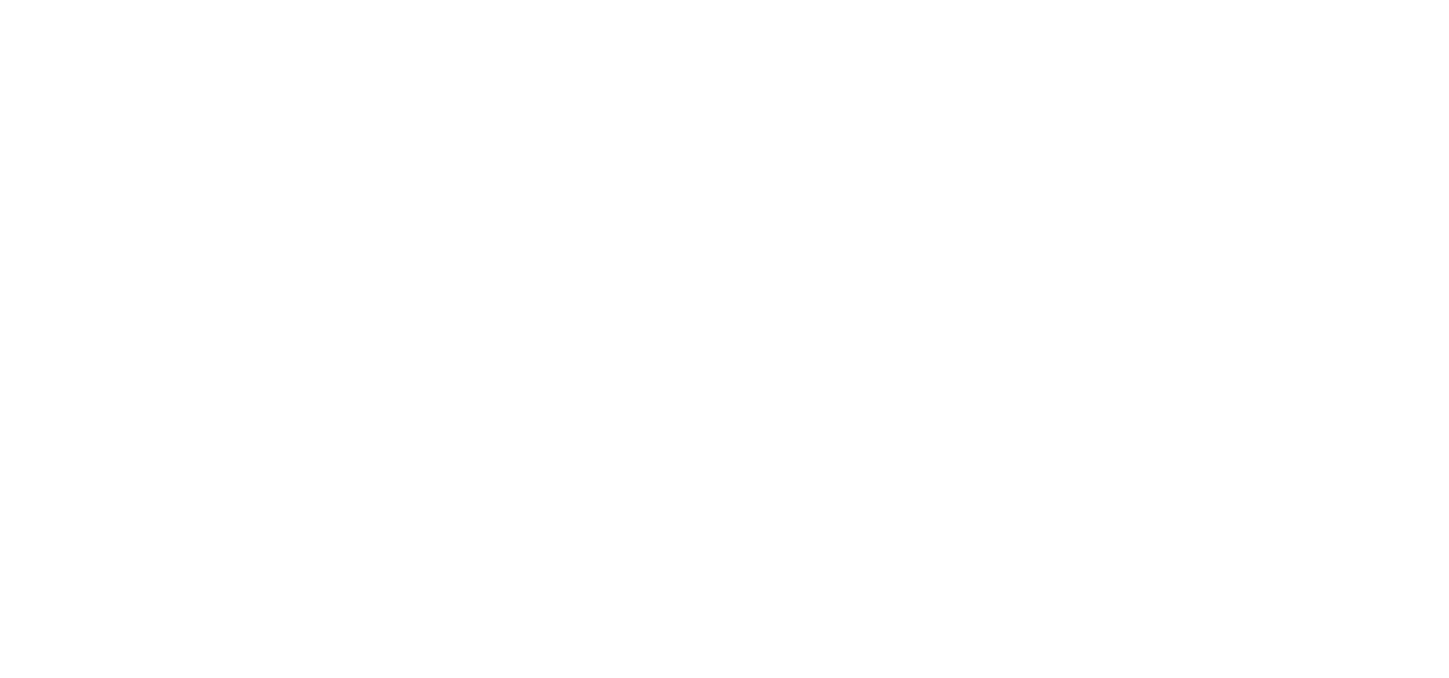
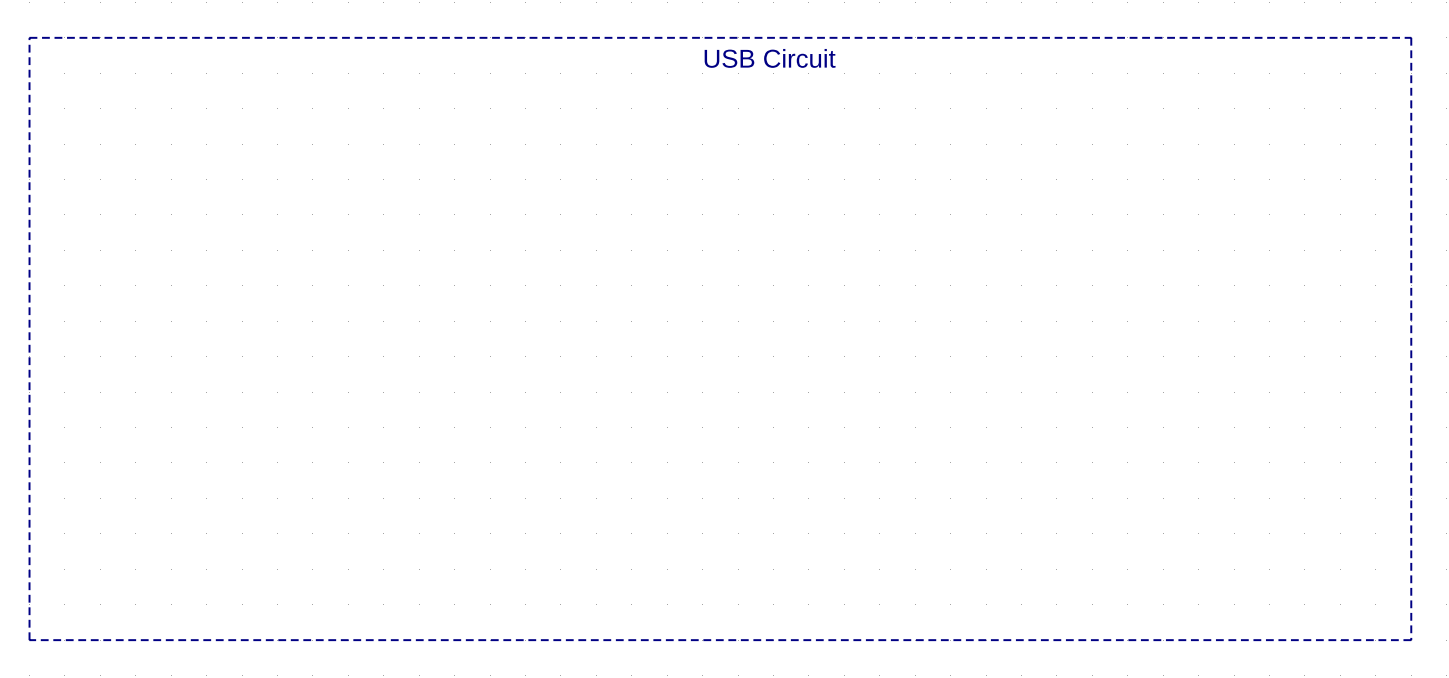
line: none -> (29, 37) (1411, 37) (1411, 640) (29, 640) (29, 37)
text: none -> USB Circuit (770, 58)

